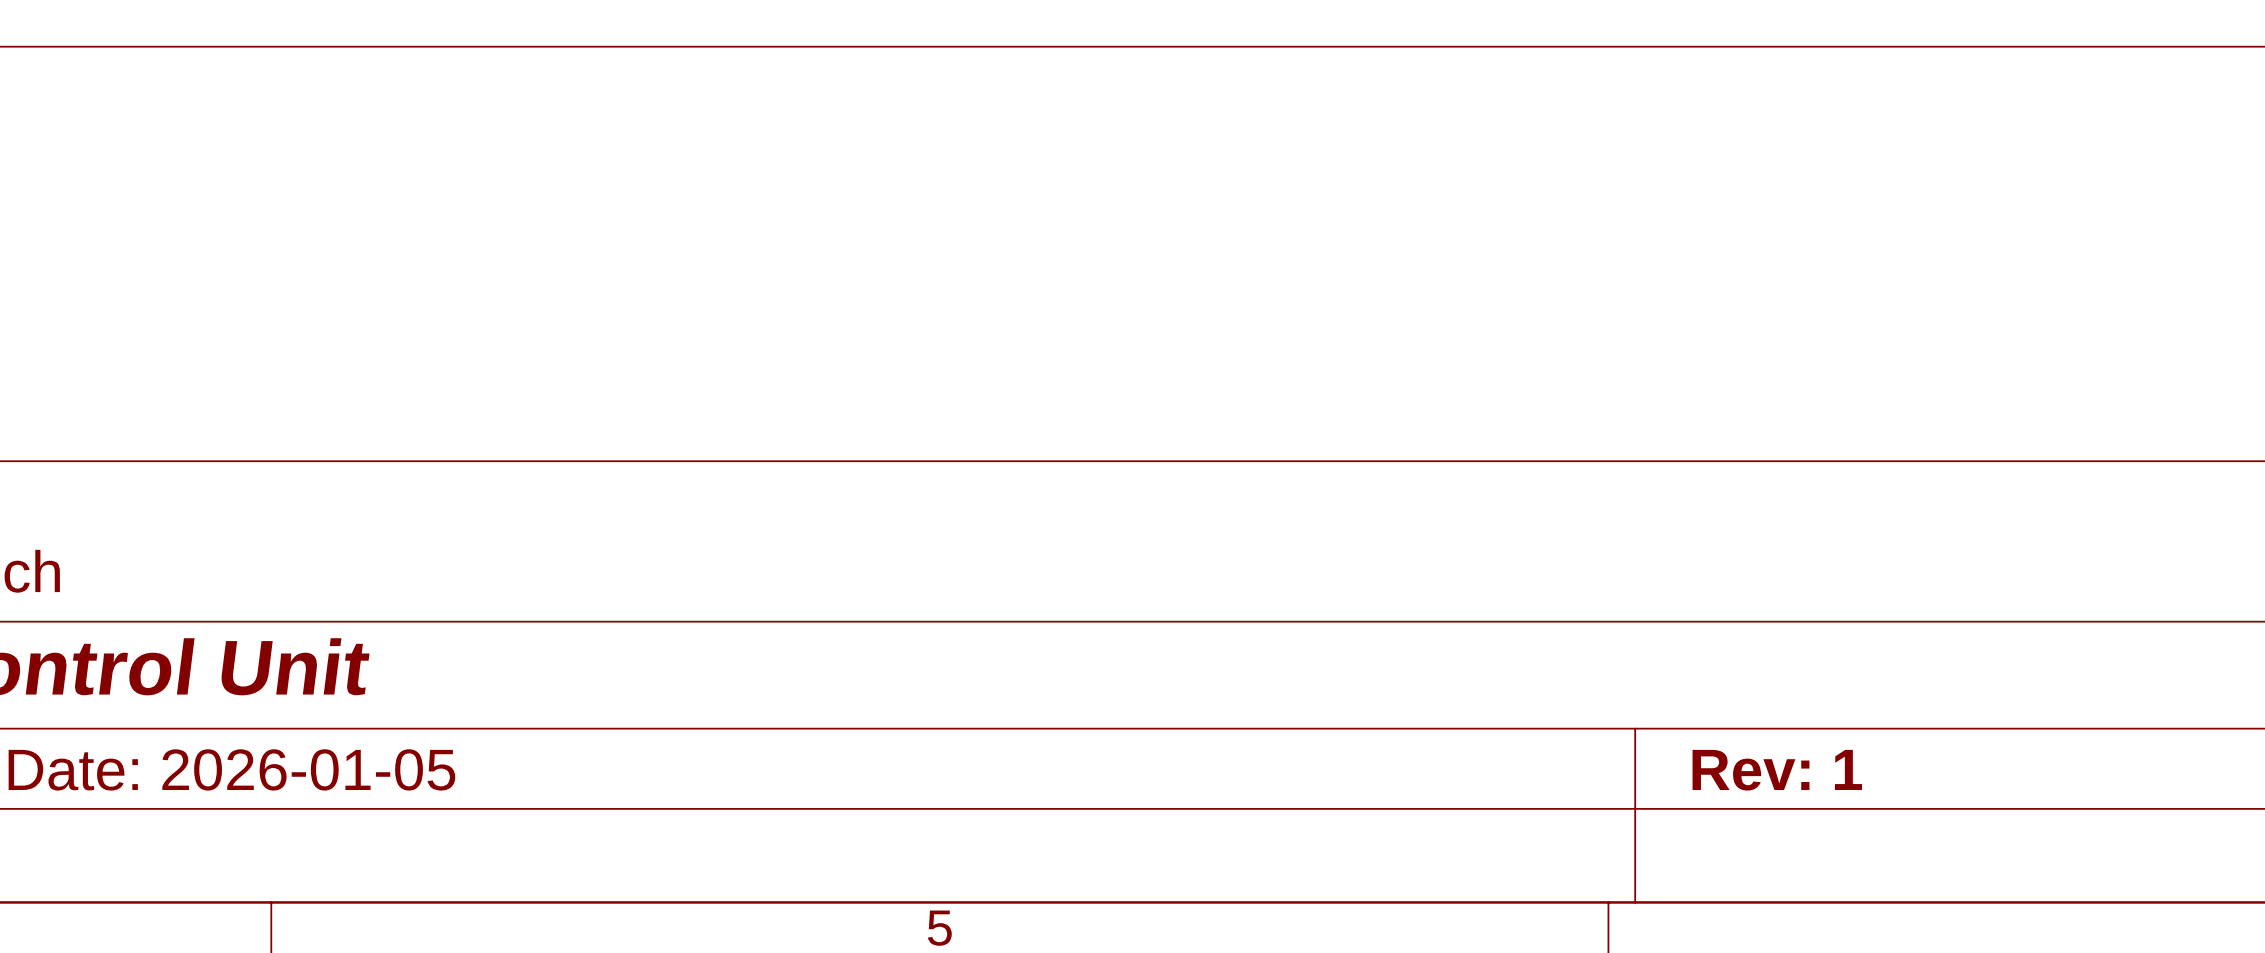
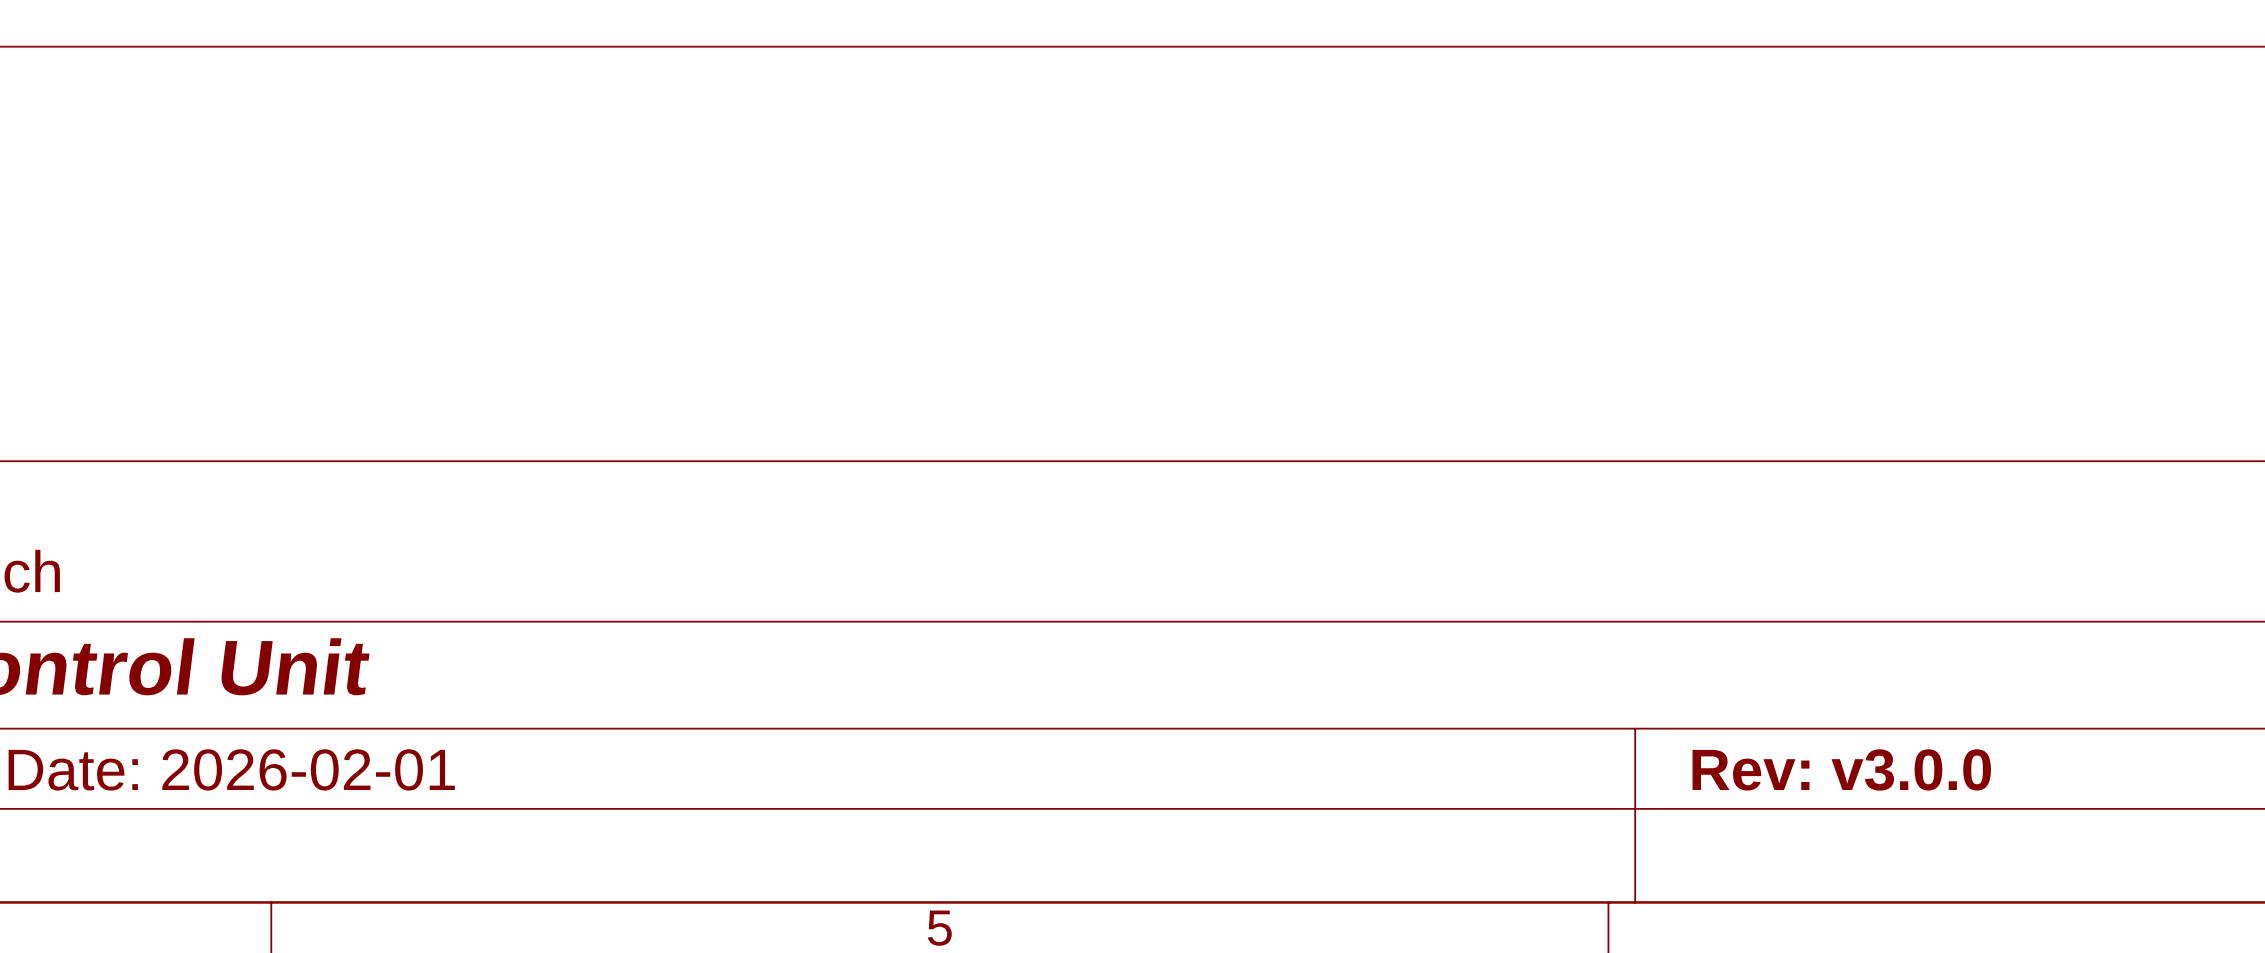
title block: Date: 2026-01-05 (231, 769) -> Date: 2026-02-01 (231, 769)
title block: Rev: 1 (1777, 770) -> Rev: v3.0.0 (1841, 769)

